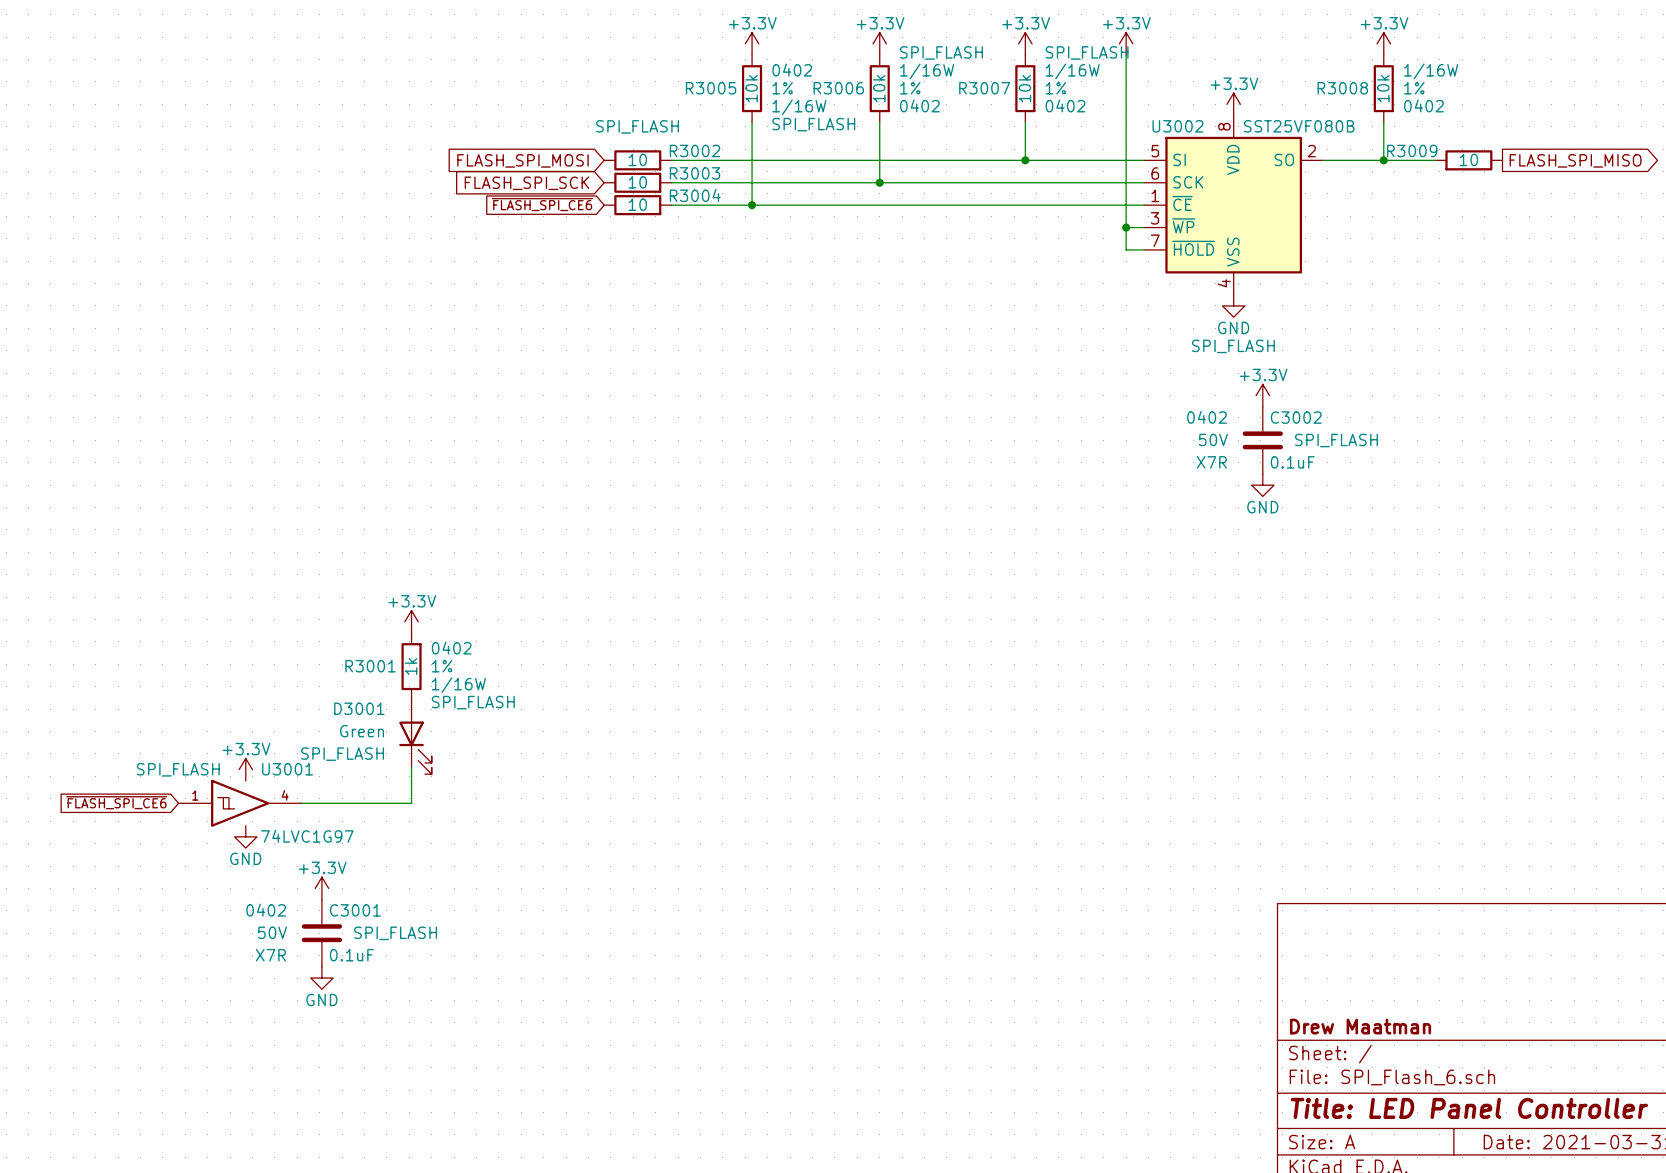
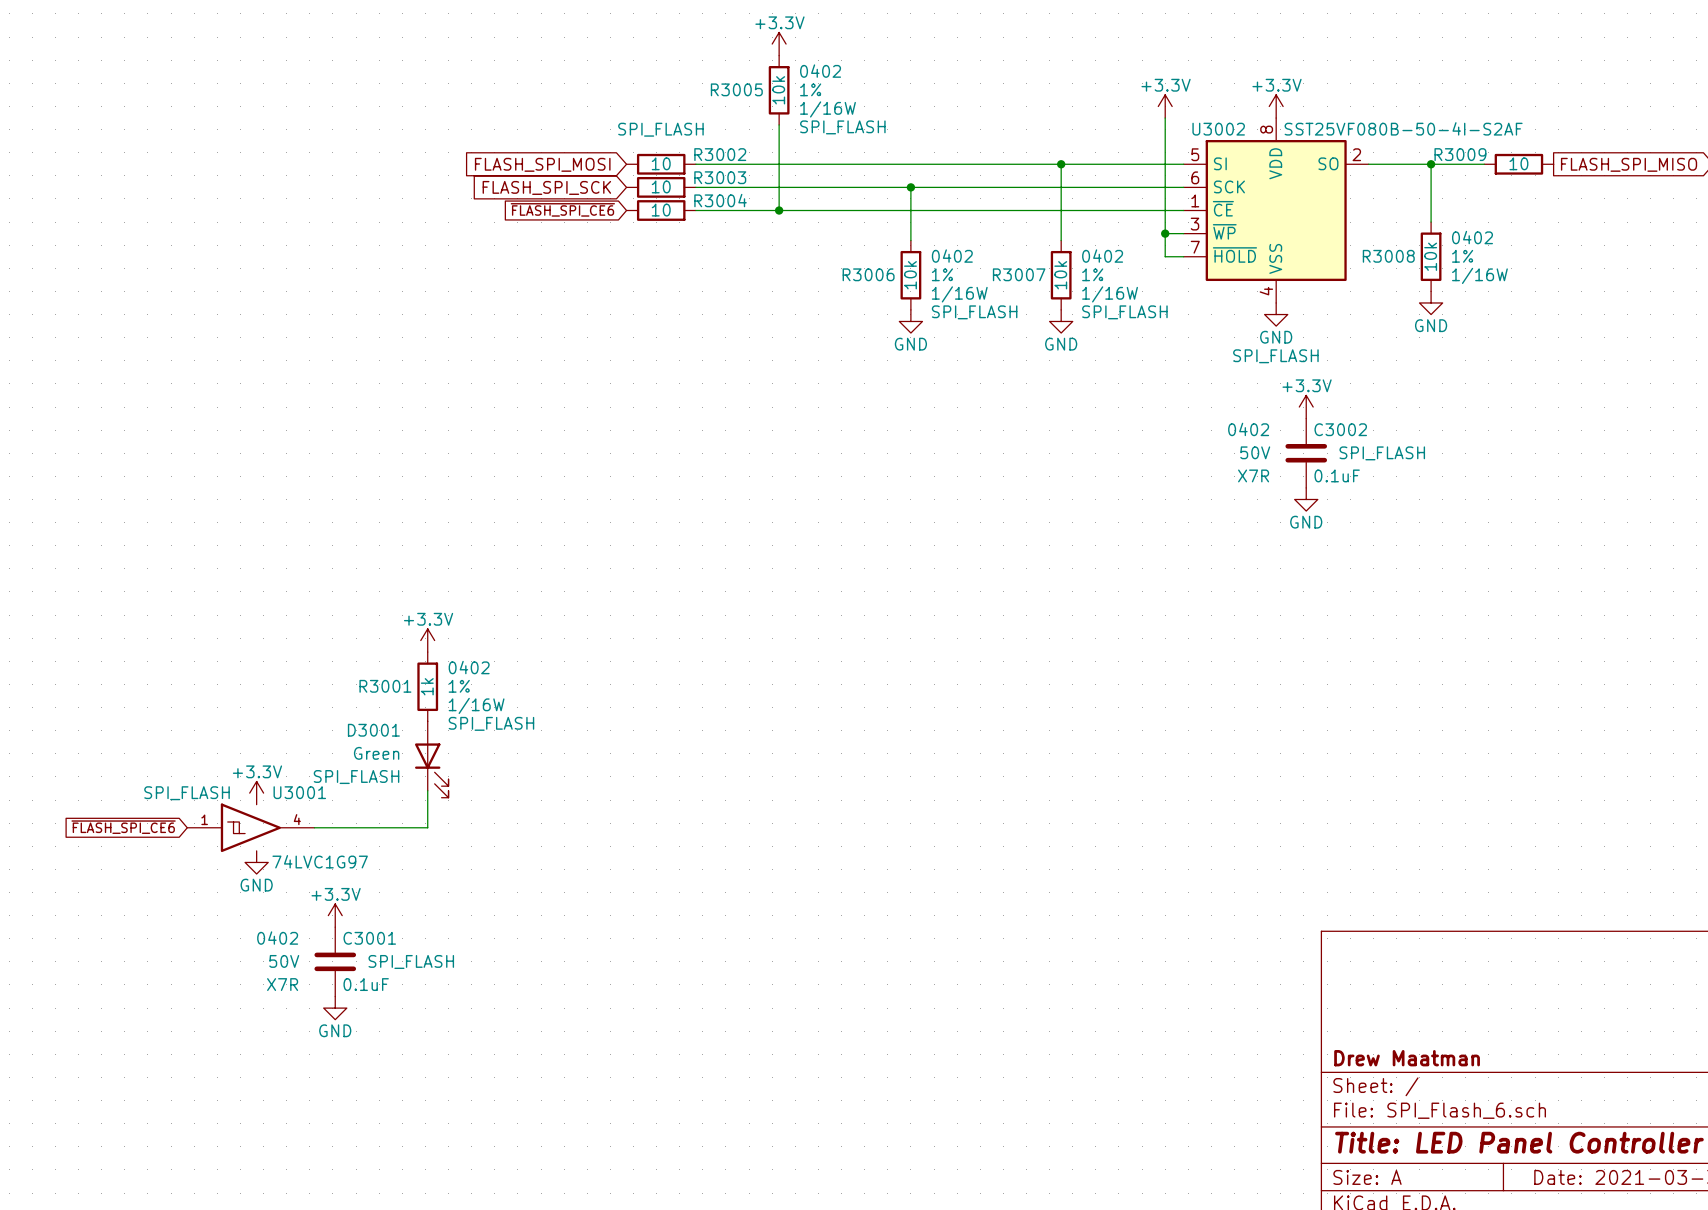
power symbol: +3.3V (879, 43) -> none
power symbol: +3.3V (1025, 43) -> none
power symbol: +3.3V (1126, 43) -> none
power symbol: +3.3V (1383, 43) -> none
R3006 text position: SPI_FLASH (941, 52) -> SPI_FLASH (974, 312)
R3007 text position: SPI_FLASH (1087, 52) -> SPI_FLASH (1124, 312)
wire: (1126, 55) (1126, 115) -> none
R3006 text position: 1/16W (927, 71) -> 1/16W (959, 294)
R3007 text position: 1/16W (1072, 71) -> 1/16W (1110, 294)
R3008 text position: 1/16W (1431, 71) -> 1/16W (1479, 275)
R3006 position: (879, 88) -> (910, 275)
R3007 position: (1025, 88) -> (1061, 275)
R3008 position: (1383, 88) -> (1431, 256)
power symbol: none -> +3.3V (1165, 106)
R3006 text position: 0402 (919, 105) -> 0402 (952, 256)
R3007 text position: 0402 (1065, 105) -> 0402 (1102, 256)
R3008 text position: 0402 (1423, 105) -> 0402 (1472, 237)
wire: (879, 122) (879, 182) -> (910, 240) (910, 187)
wire: (1025, 122) (1025, 160) -> (1061, 240) (1061, 164)
wire: (1383, 122) (1383, 160) -> (1431, 222) (1431, 164)
U3002 value: SST25VF080B (1299, 126) -> SST25VF080B-50-4I-S2AF (1403, 128)
power symbol: none -> GND (1431, 302)
power symbol: none -> GND (910, 321)
power symbol: none -> GND (1061, 321)

